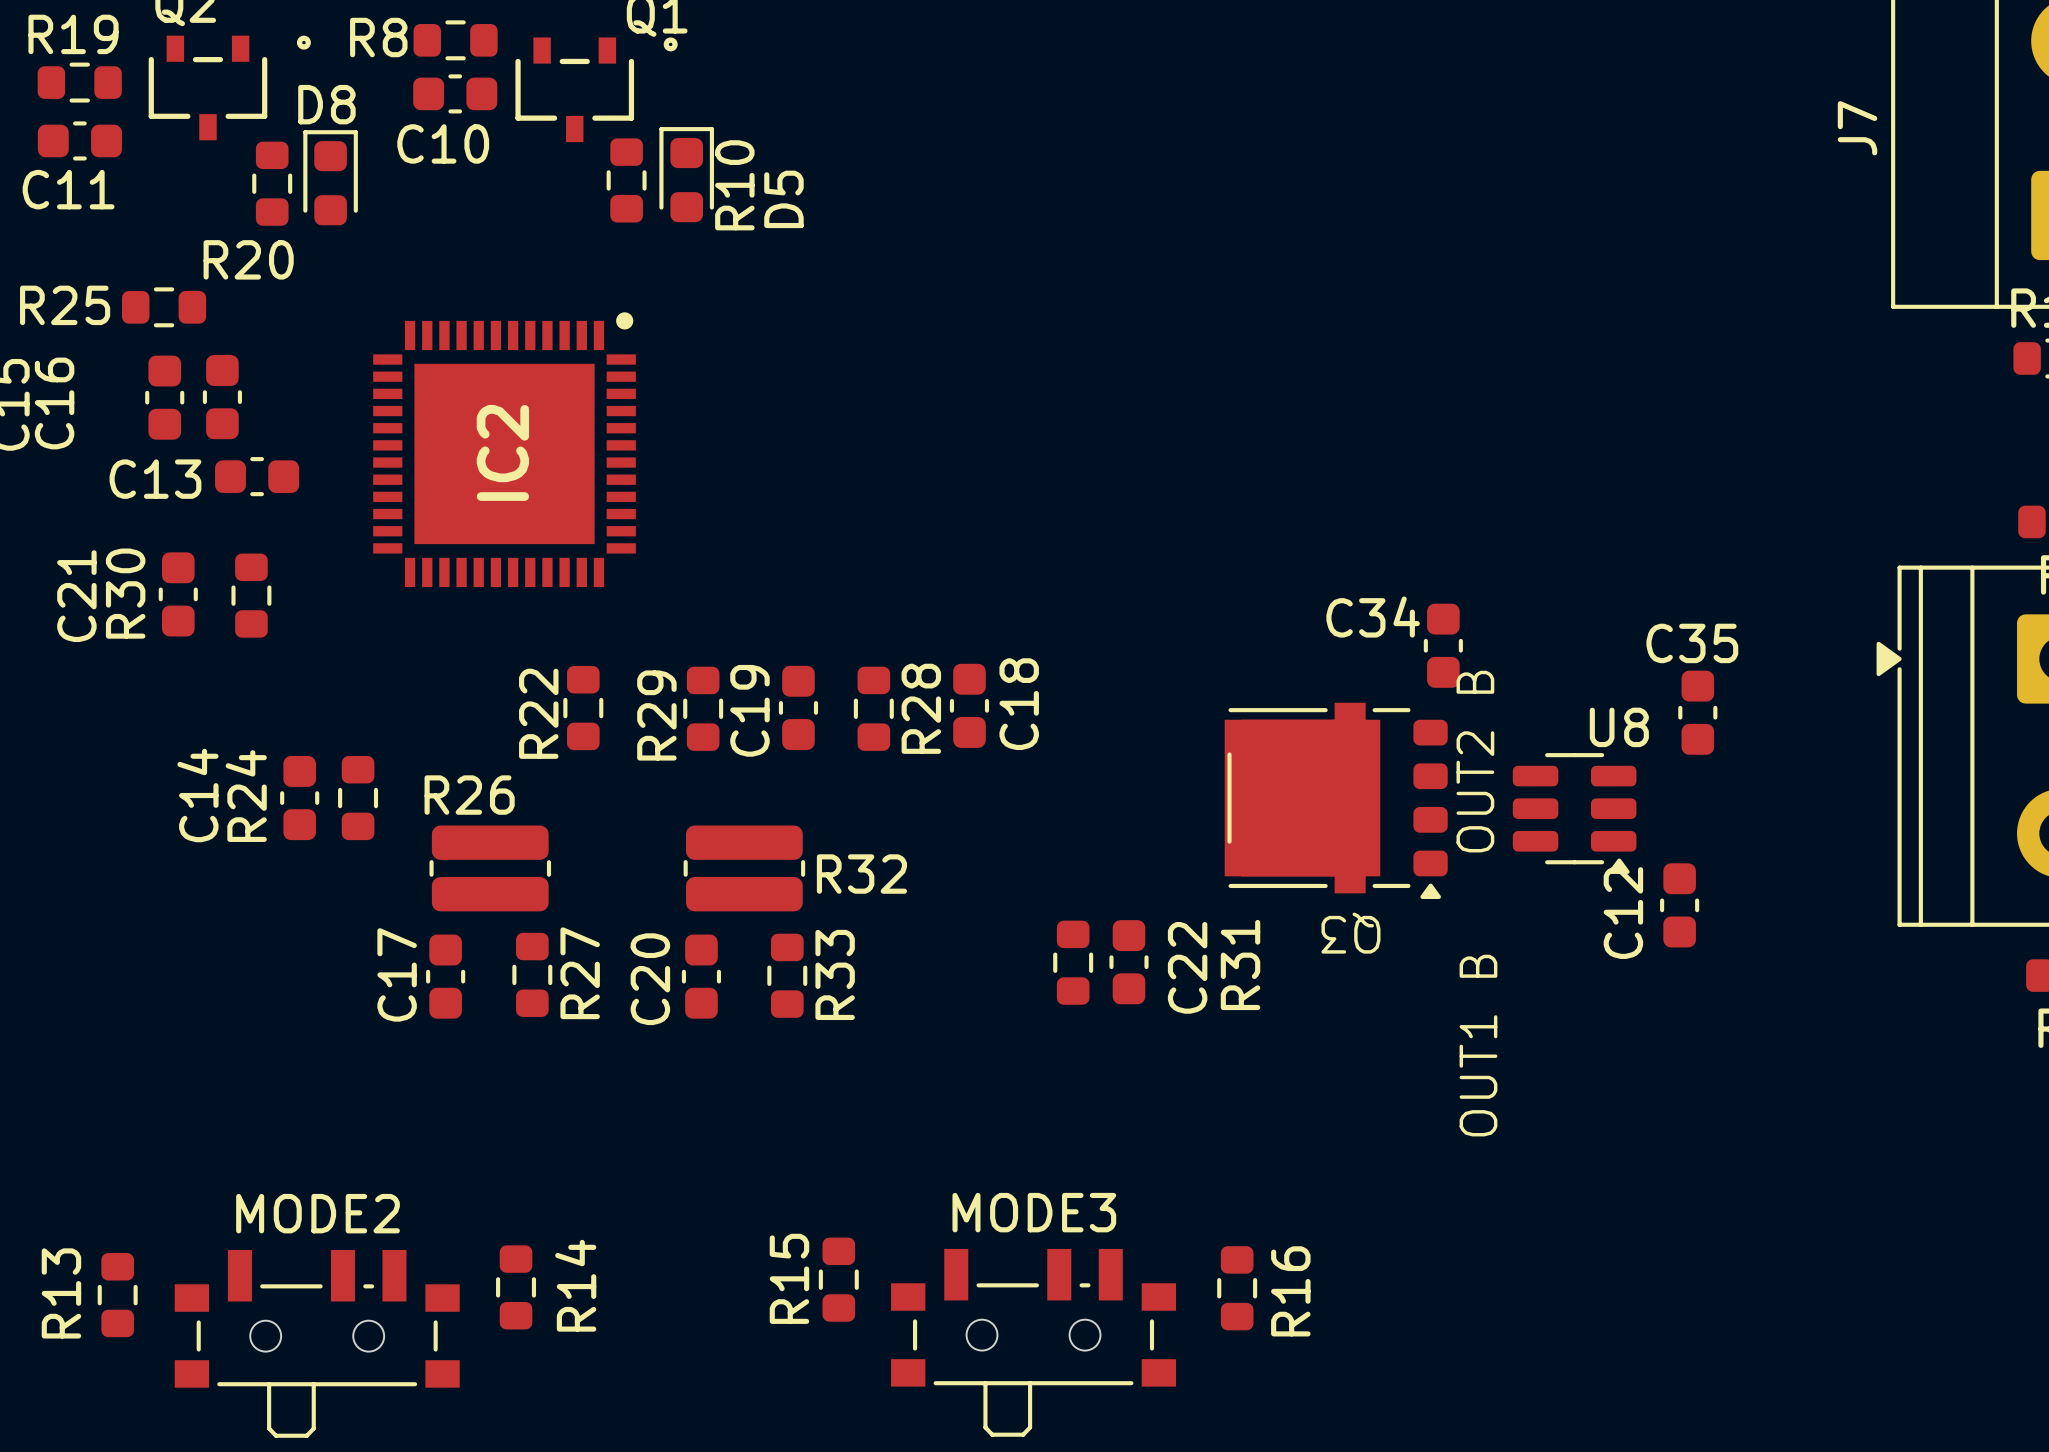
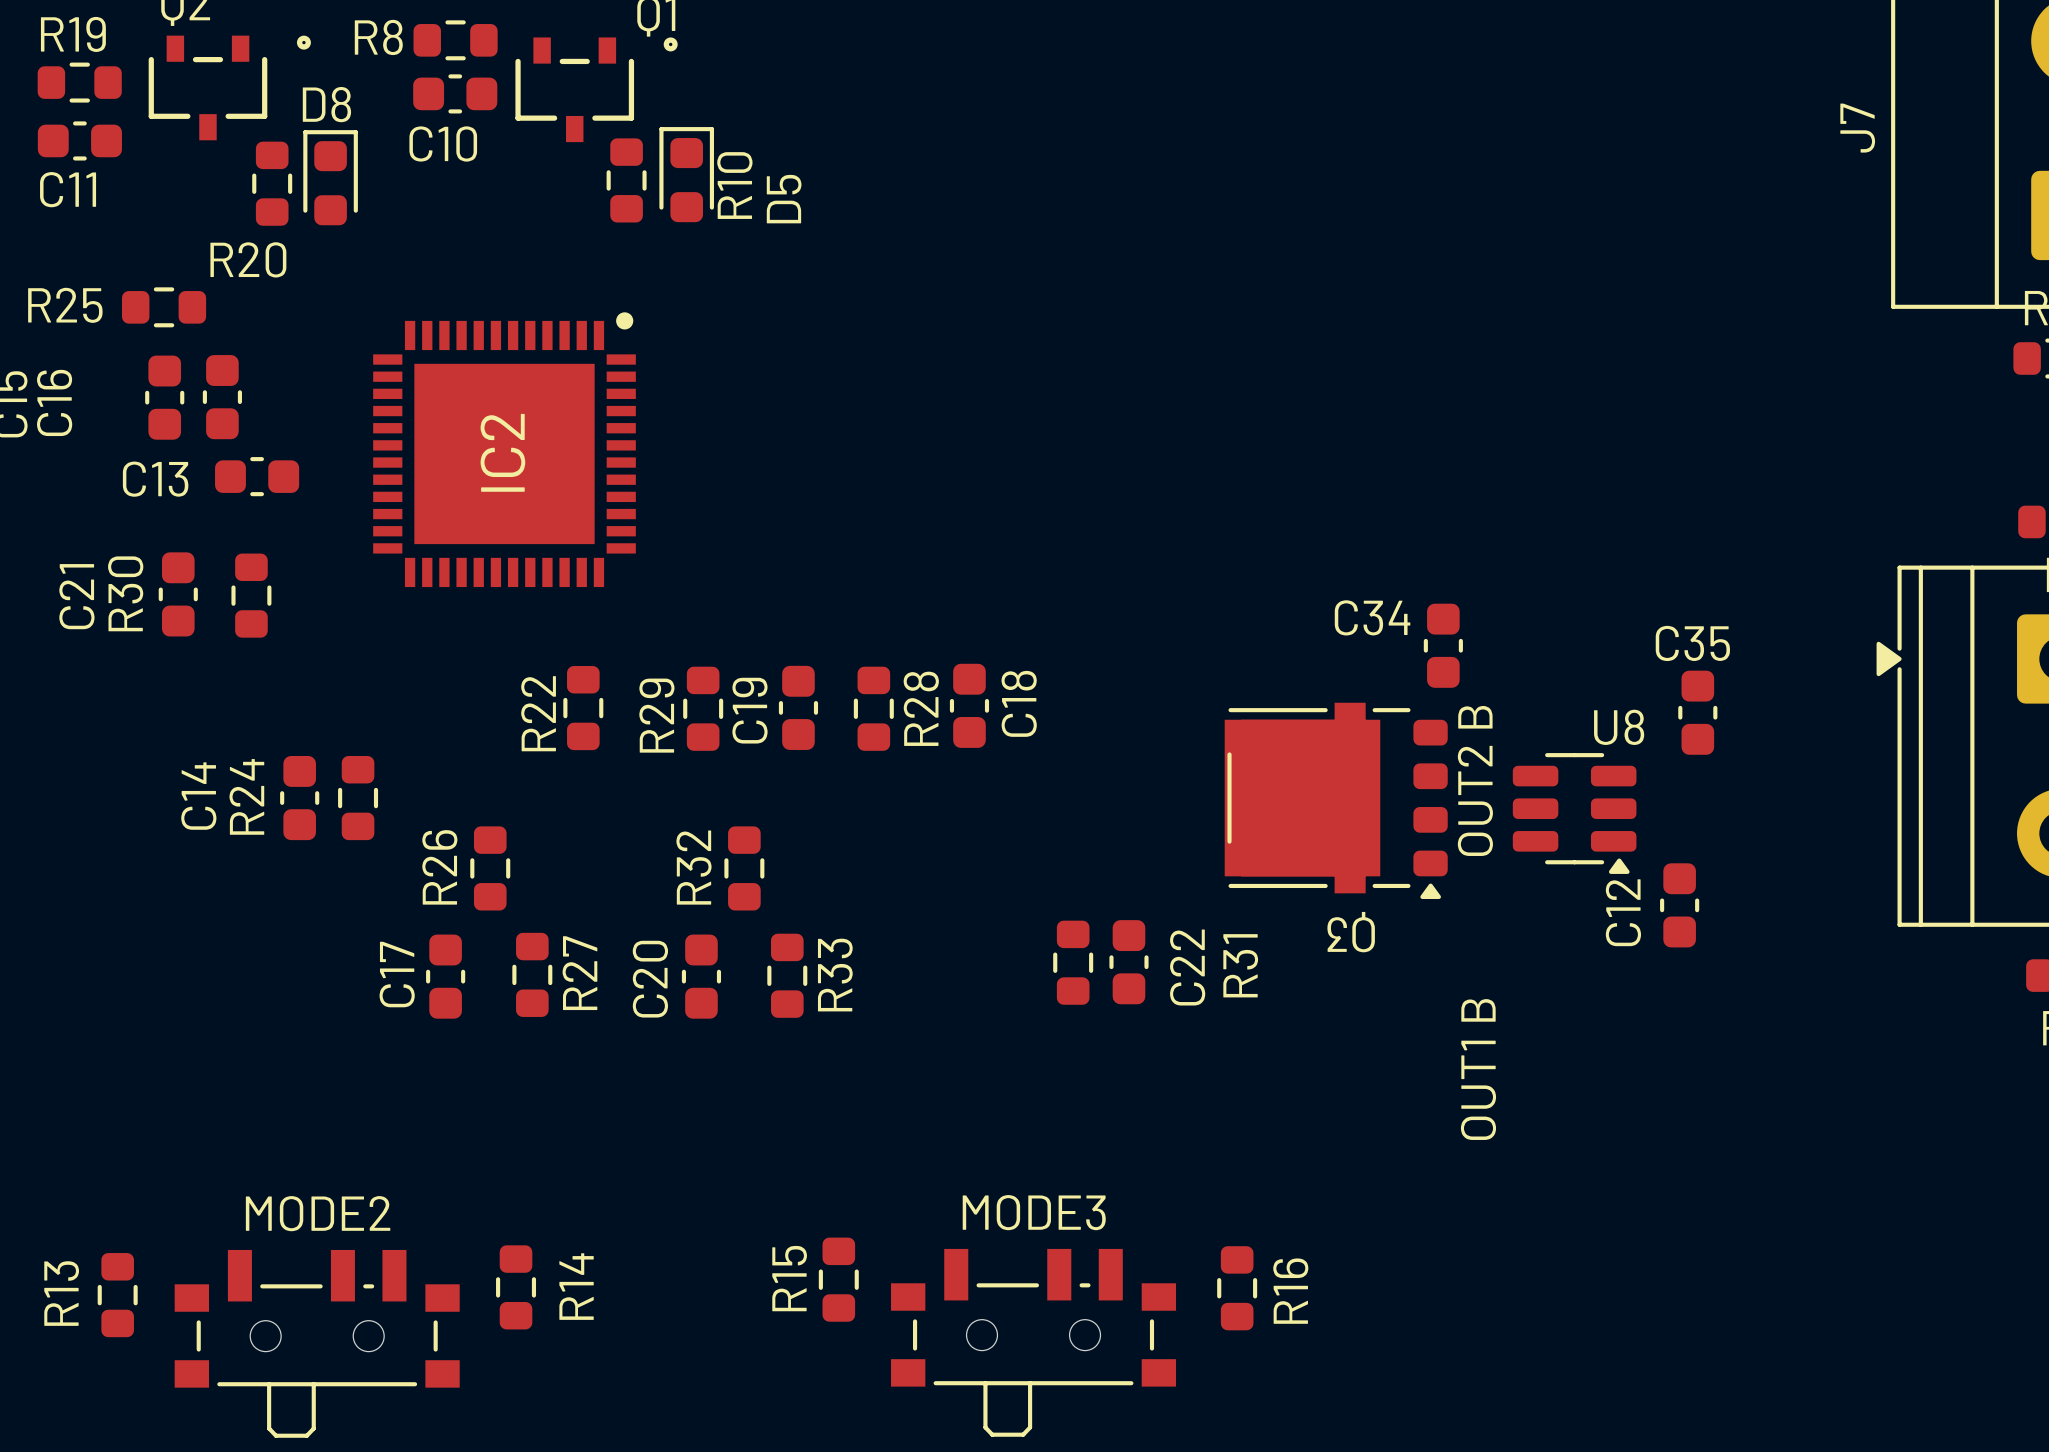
R26 name position: R26 (469, 795) -> R26 (439, 867)
R26 footprint: [429, 825, 552, 912] -> [470, 826, 511, 911]
R32 footprint: [683, 825, 806, 912] -> [724, 826, 765, 911]
R32 name position: R32 (861, 874) -> R32 (693, 867)

